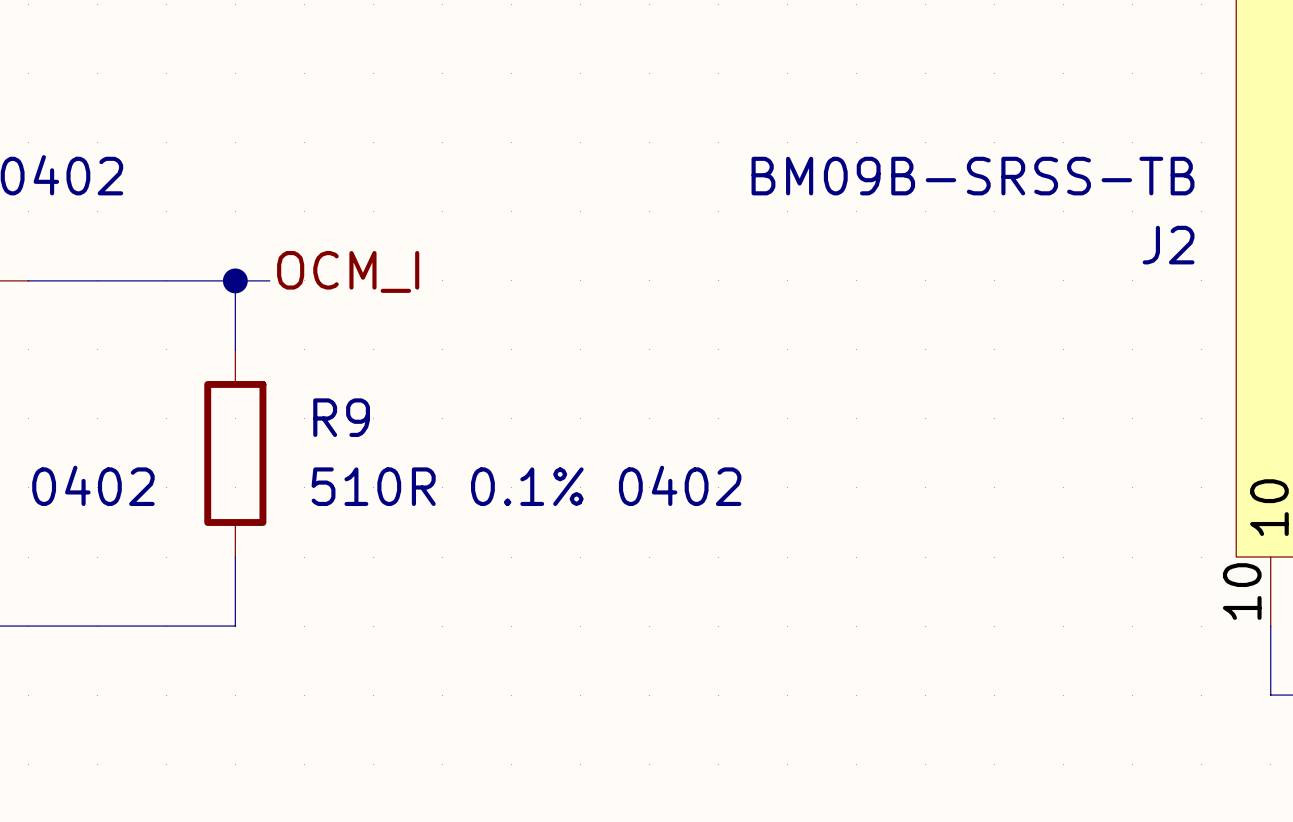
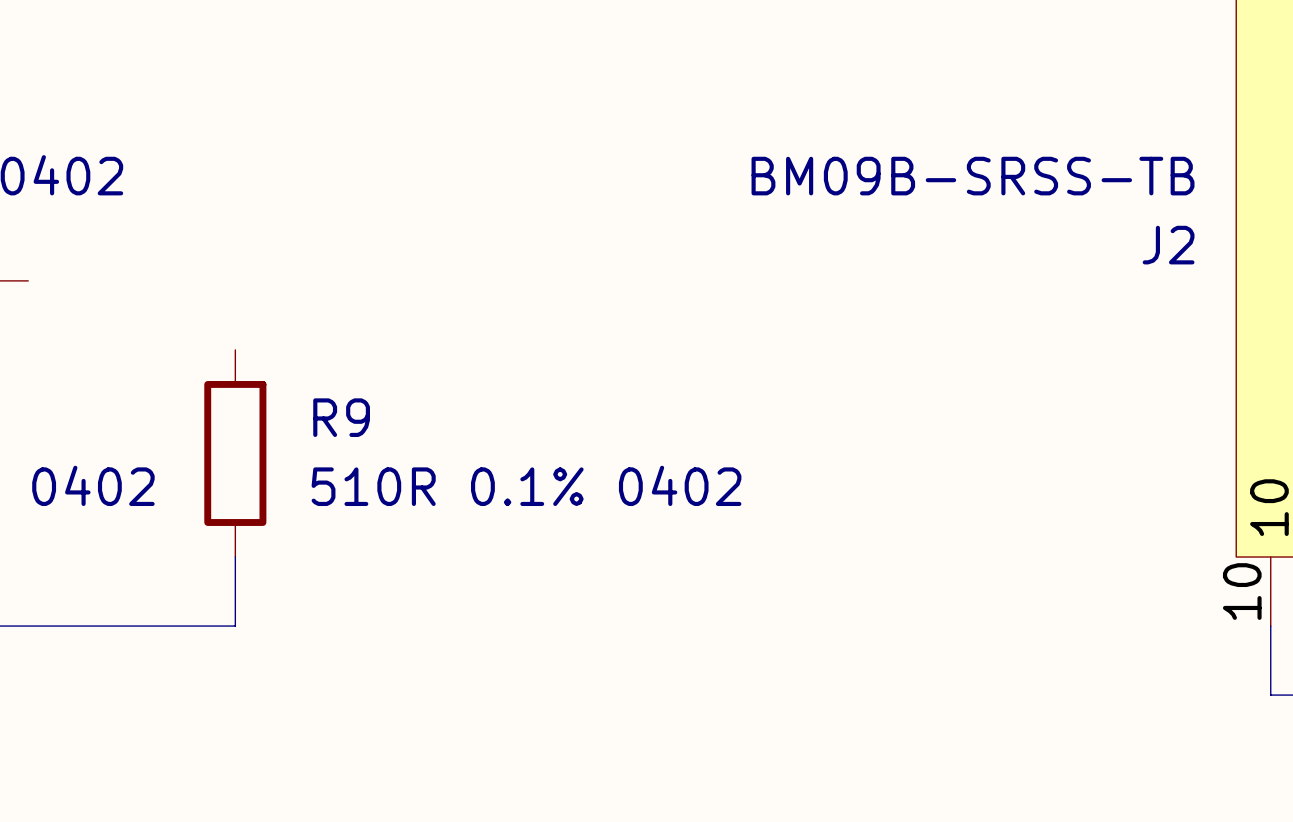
label: OCM_I (348, 271) -> none
wire: (28, 280) (269, 280) -> none
wire: (235, 280) (235, 349) -> none
junction: (235, 280) -> none

